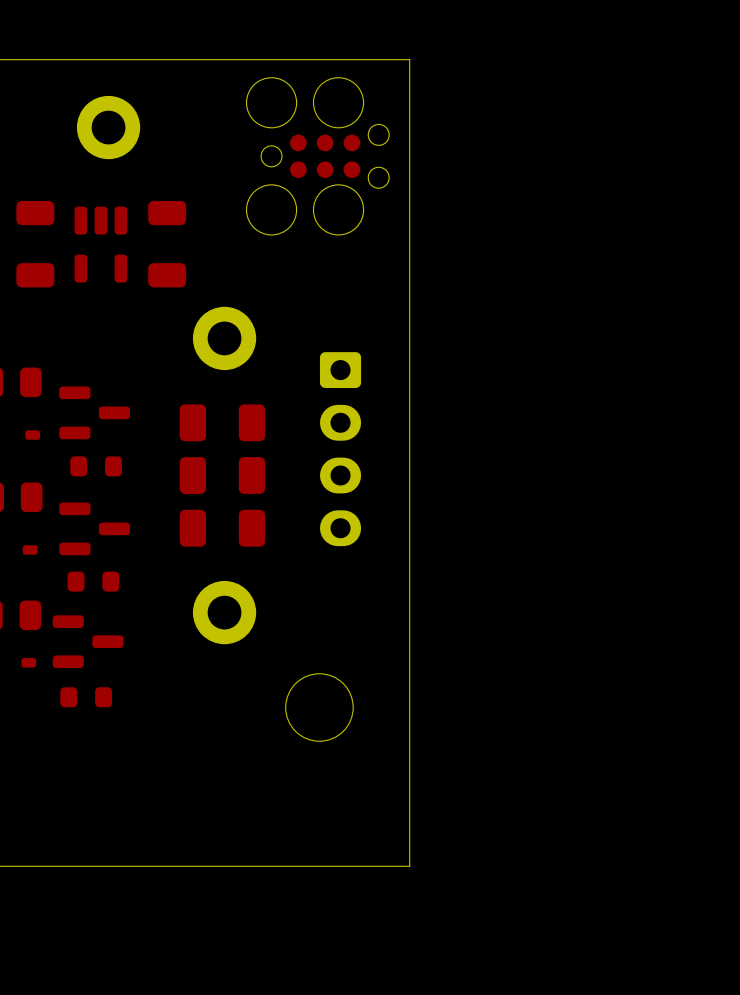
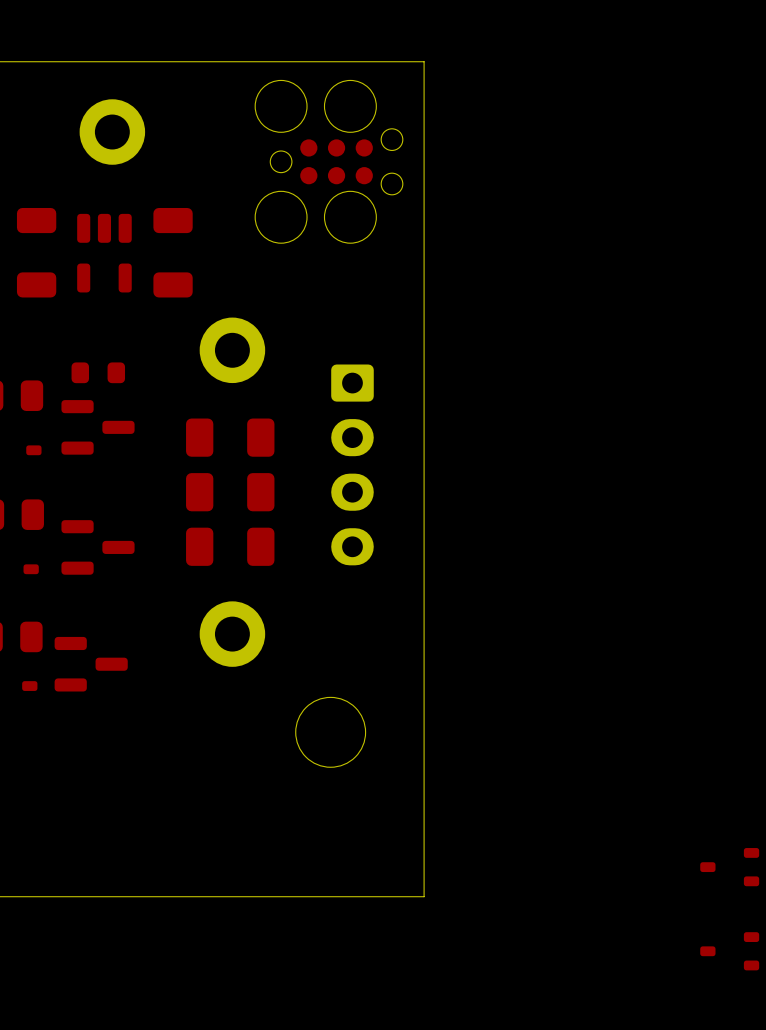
part position: (96, 466) -> (98, 372)
part: (93, 581) -> none
part: (86, 697) -> none
part: none -> (729, 867)
part: none -> (729, 951)

